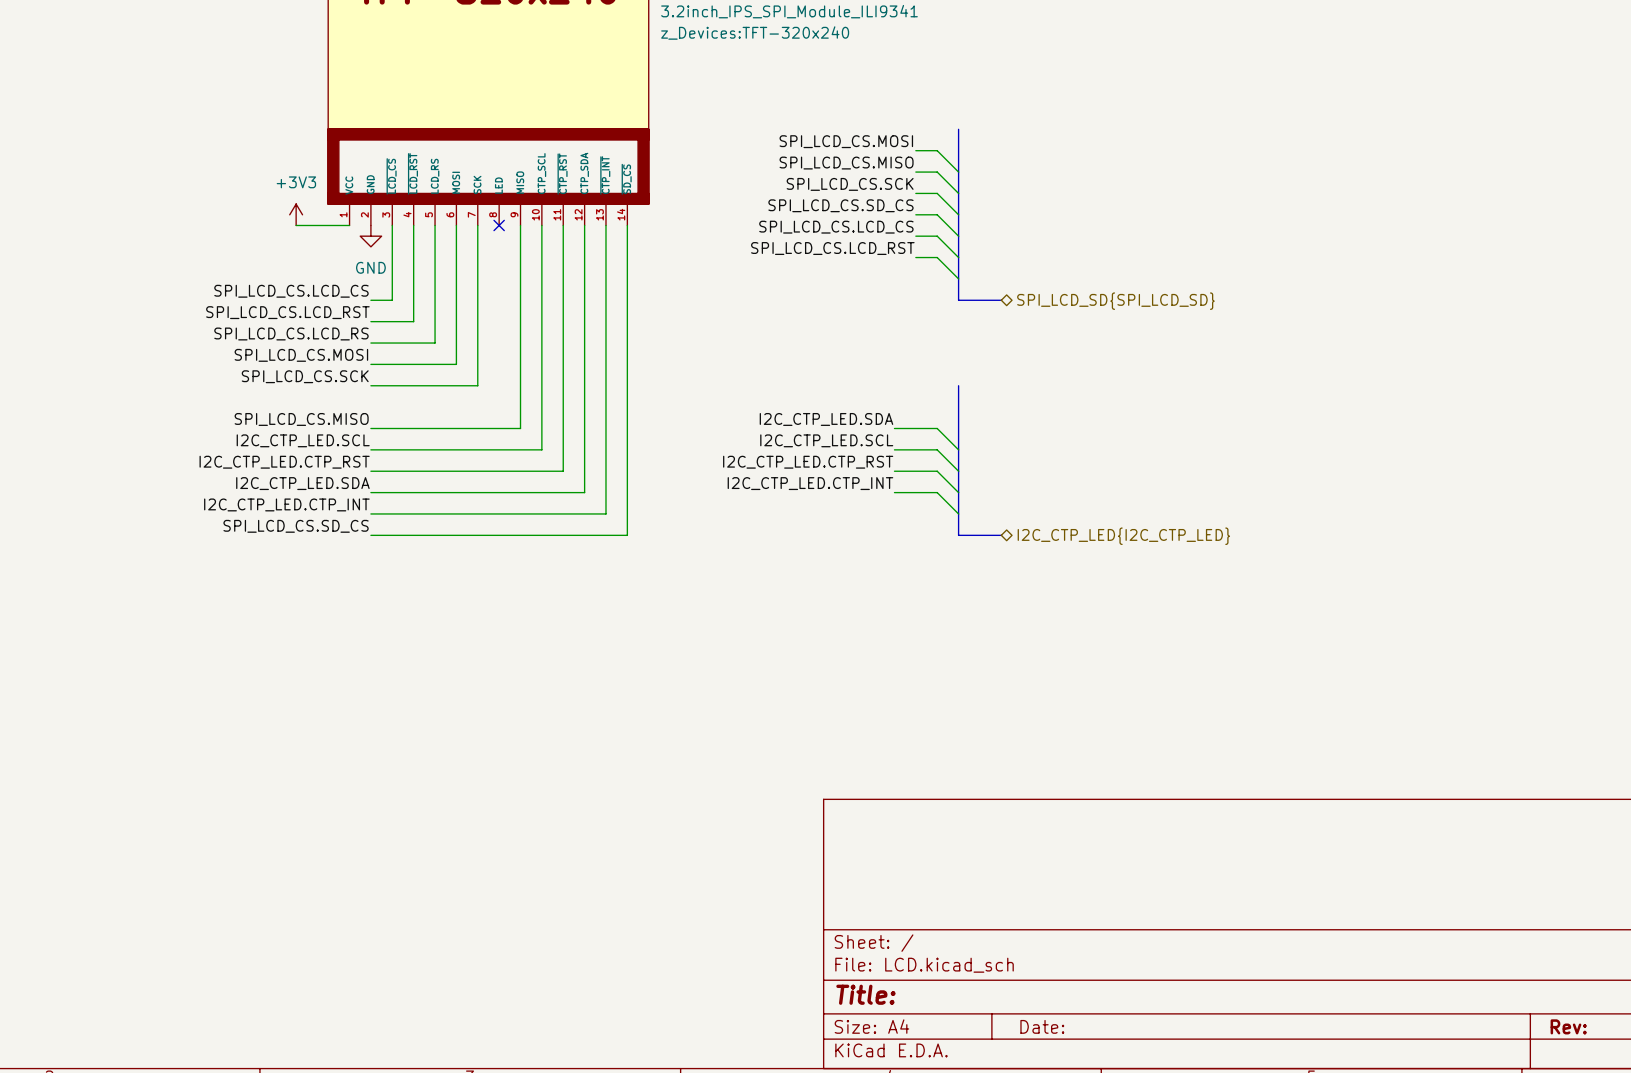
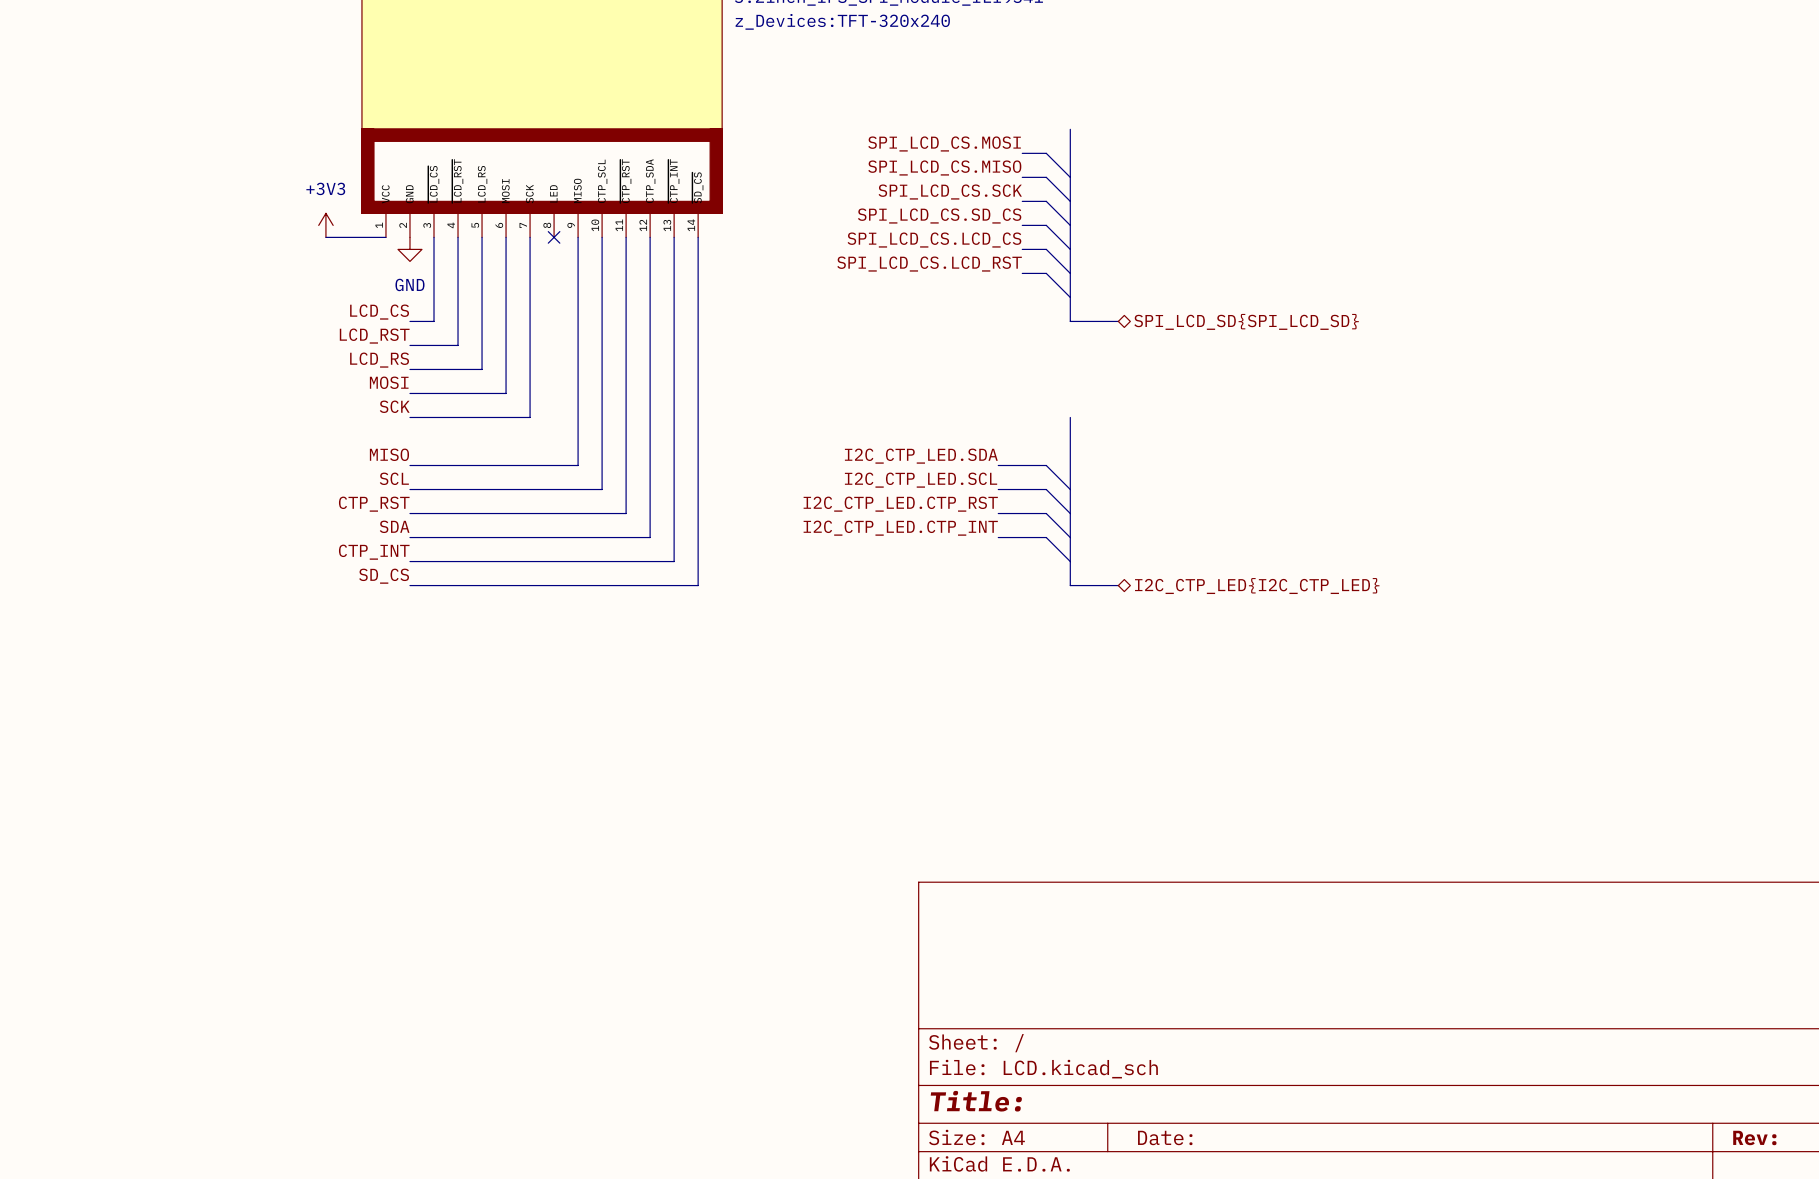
label: SPI_LCD_CS.LCD_CS (291, 291) -> LCD_CS (379, 312)
label: SPI_LCD_CS.LCD_RST (287, 312) -> LCD_RST (374, 336)
label: SPI_LCD_CS.LCD_RS (291, 333) -> LCD_RS (379, 360)
label: SPI_LCD_CS.MOSI (301, 355) -> MOSI (389, 382)
label: SPI_LCD_CS.SCK (305, 376) -> SCK (394, 406)
label: SPI_LCD_CS.MISO (301, 419) -> MISO (389, 454)
label: I2C_CTP_LED.SCL (303, 440) -> SCL (394, 478)
label: I2C_CTP_LED.CTP_RST (284, 462) -> CTP_RST (374, 504)
label: I2C_CTP_LED.SDA (302, 483) -> SDA (394, 526)
label: I2C_CTP_LED.CTP_INT (286, 504) -> CTP_INT (374, 552)
label: SPI_LCD_CS.SD_CS (296, 526) -> SD_CS (384, 576)

